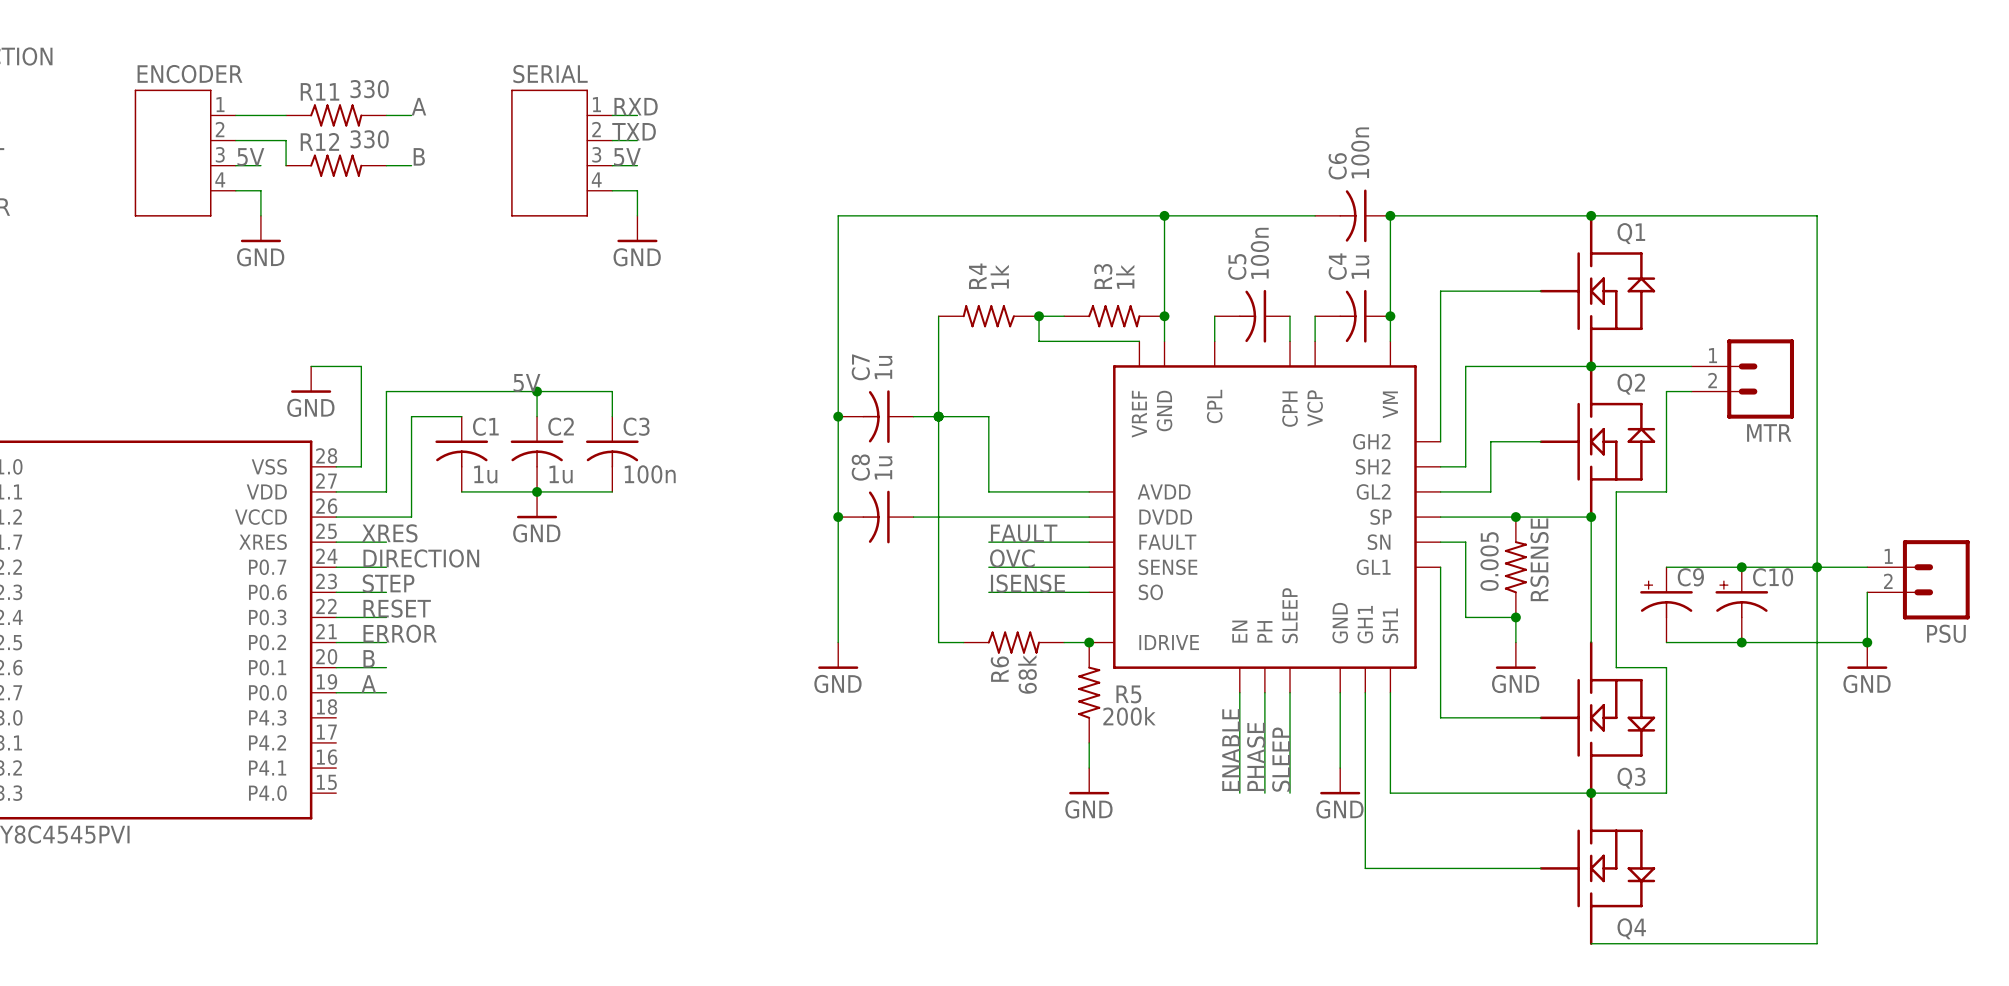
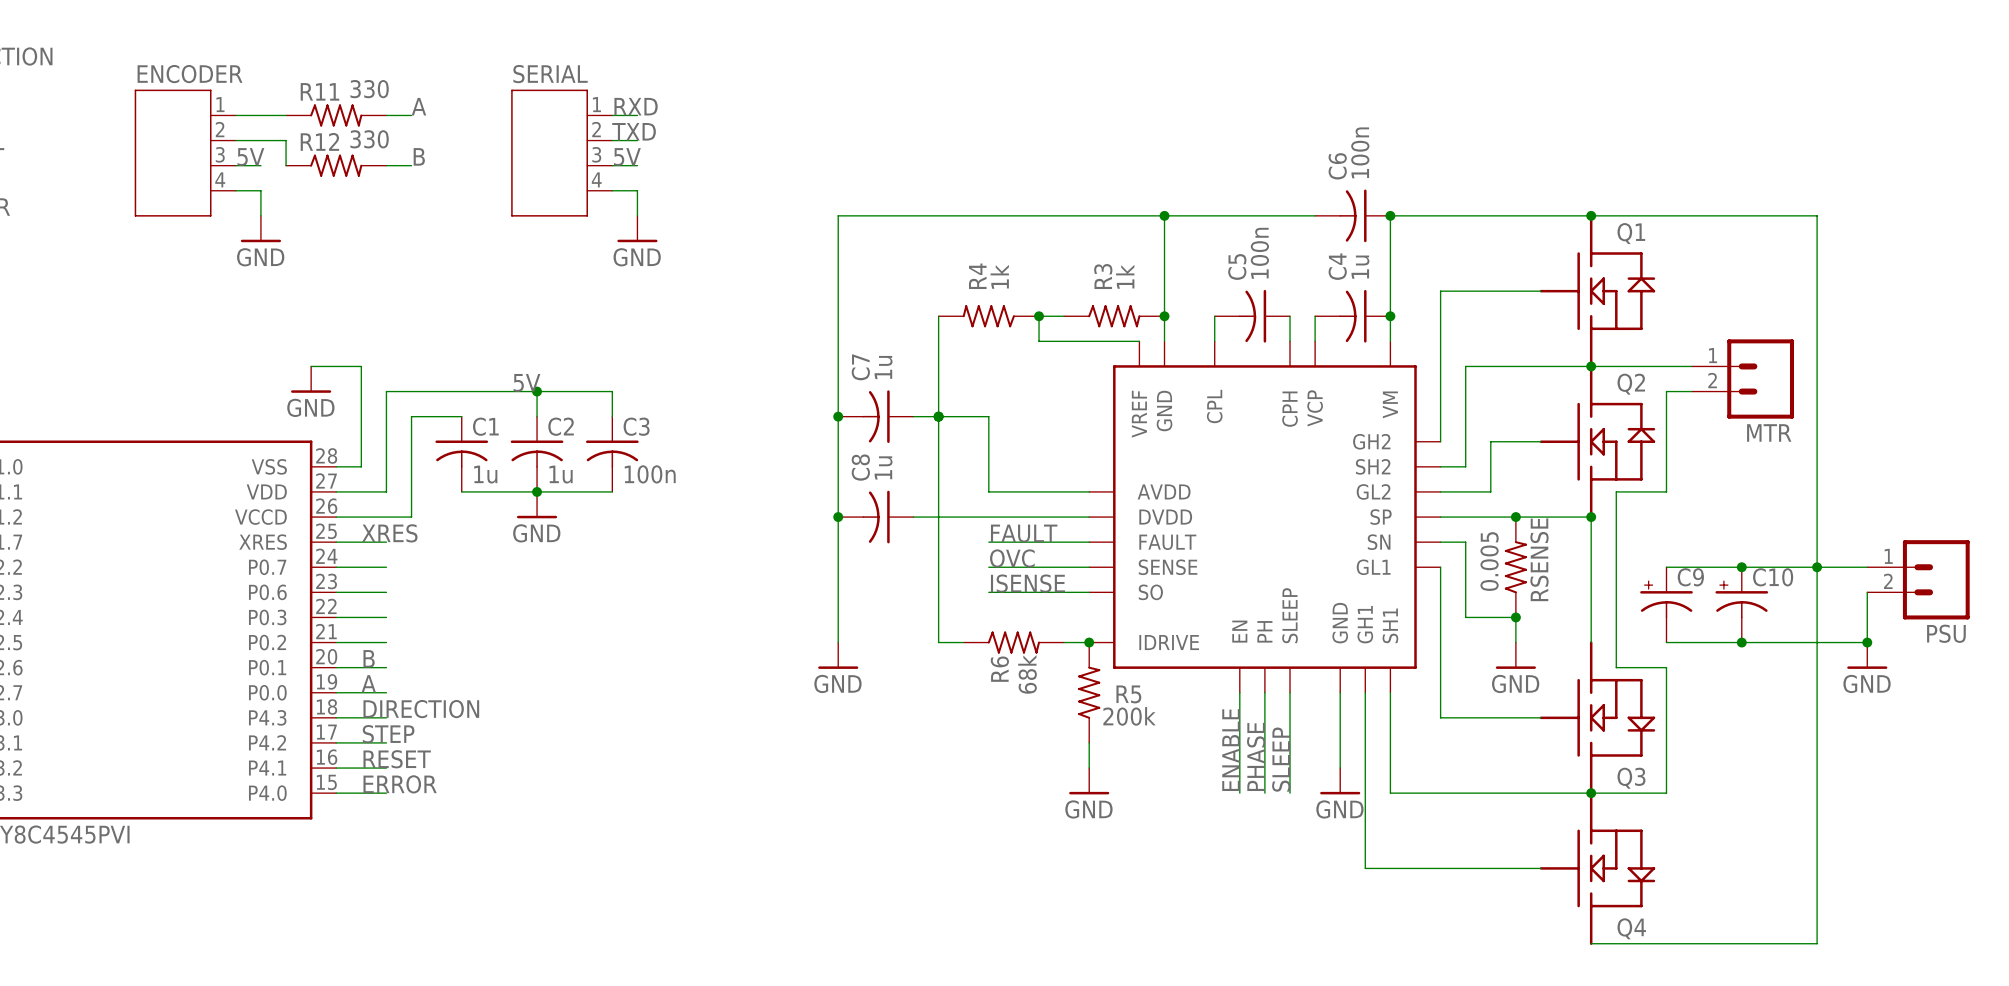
label position: DIRECTION (421, 558) -> DIRECTION (421, 709)
label position: STEP (388, 583) -> STEP (388, 734)
label position: RESET (397, 608) -> RESET (397, 759)
label position: ERROR (400, 633) -> ERROR (400, 784)
wire: none -> (336, 717) (386, 717)
wire: none -> (336, 742) (386, 742)
wire: none -> (336, 768) (386, 768)
wire: none -> (336, 793) (386, 793)

